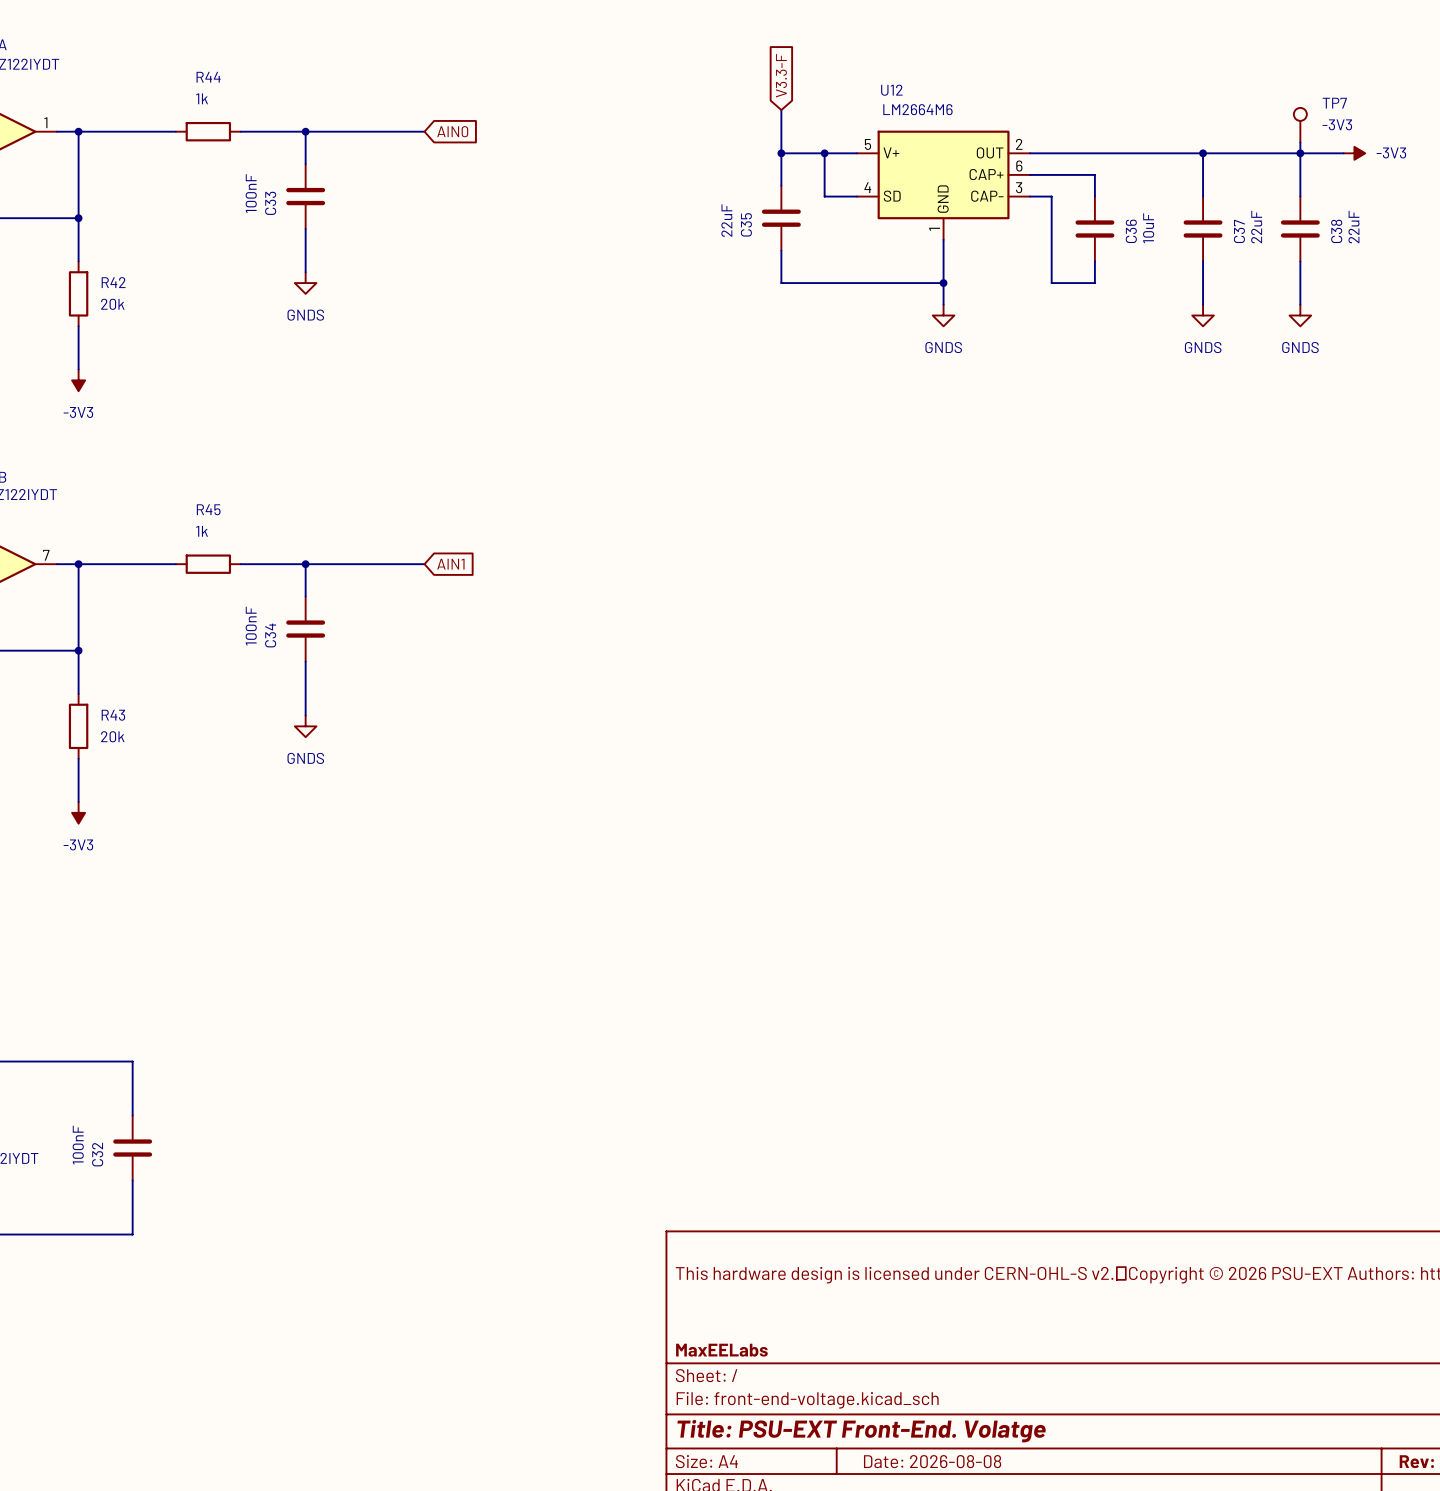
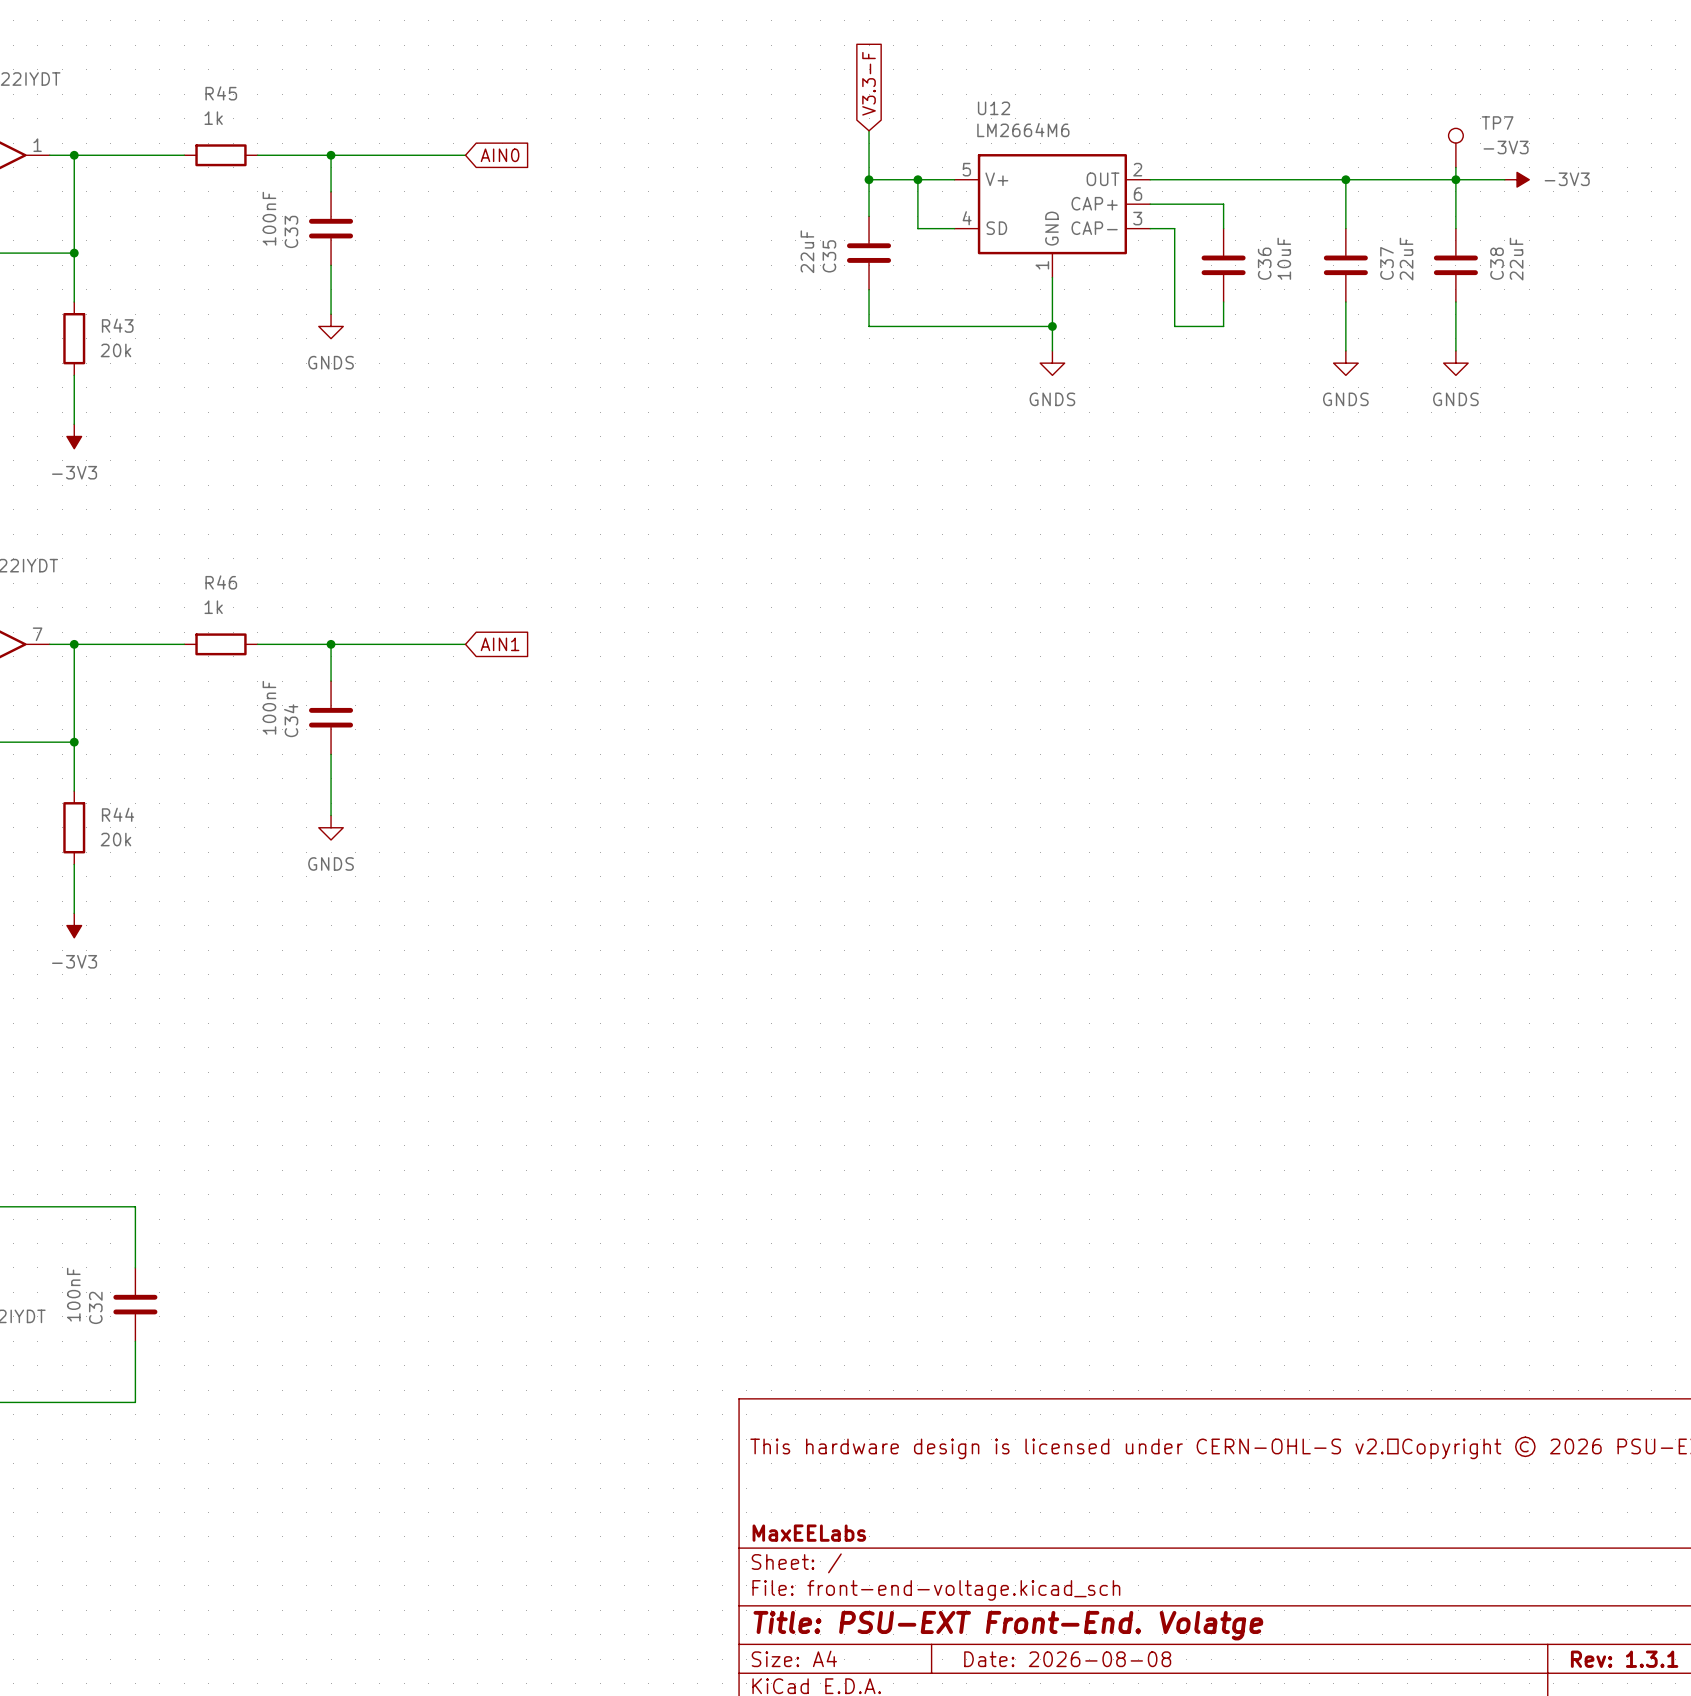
R44 name: R44 (208, 77) -> R45 (221, 93)
R42 name: R42 (113, 282) -> R43 (117, 325)
R45 name: R45 (208, 509) -> R46 (221, 582)
R43 name: R43 (113, 715) -> R44 (118, 814)

